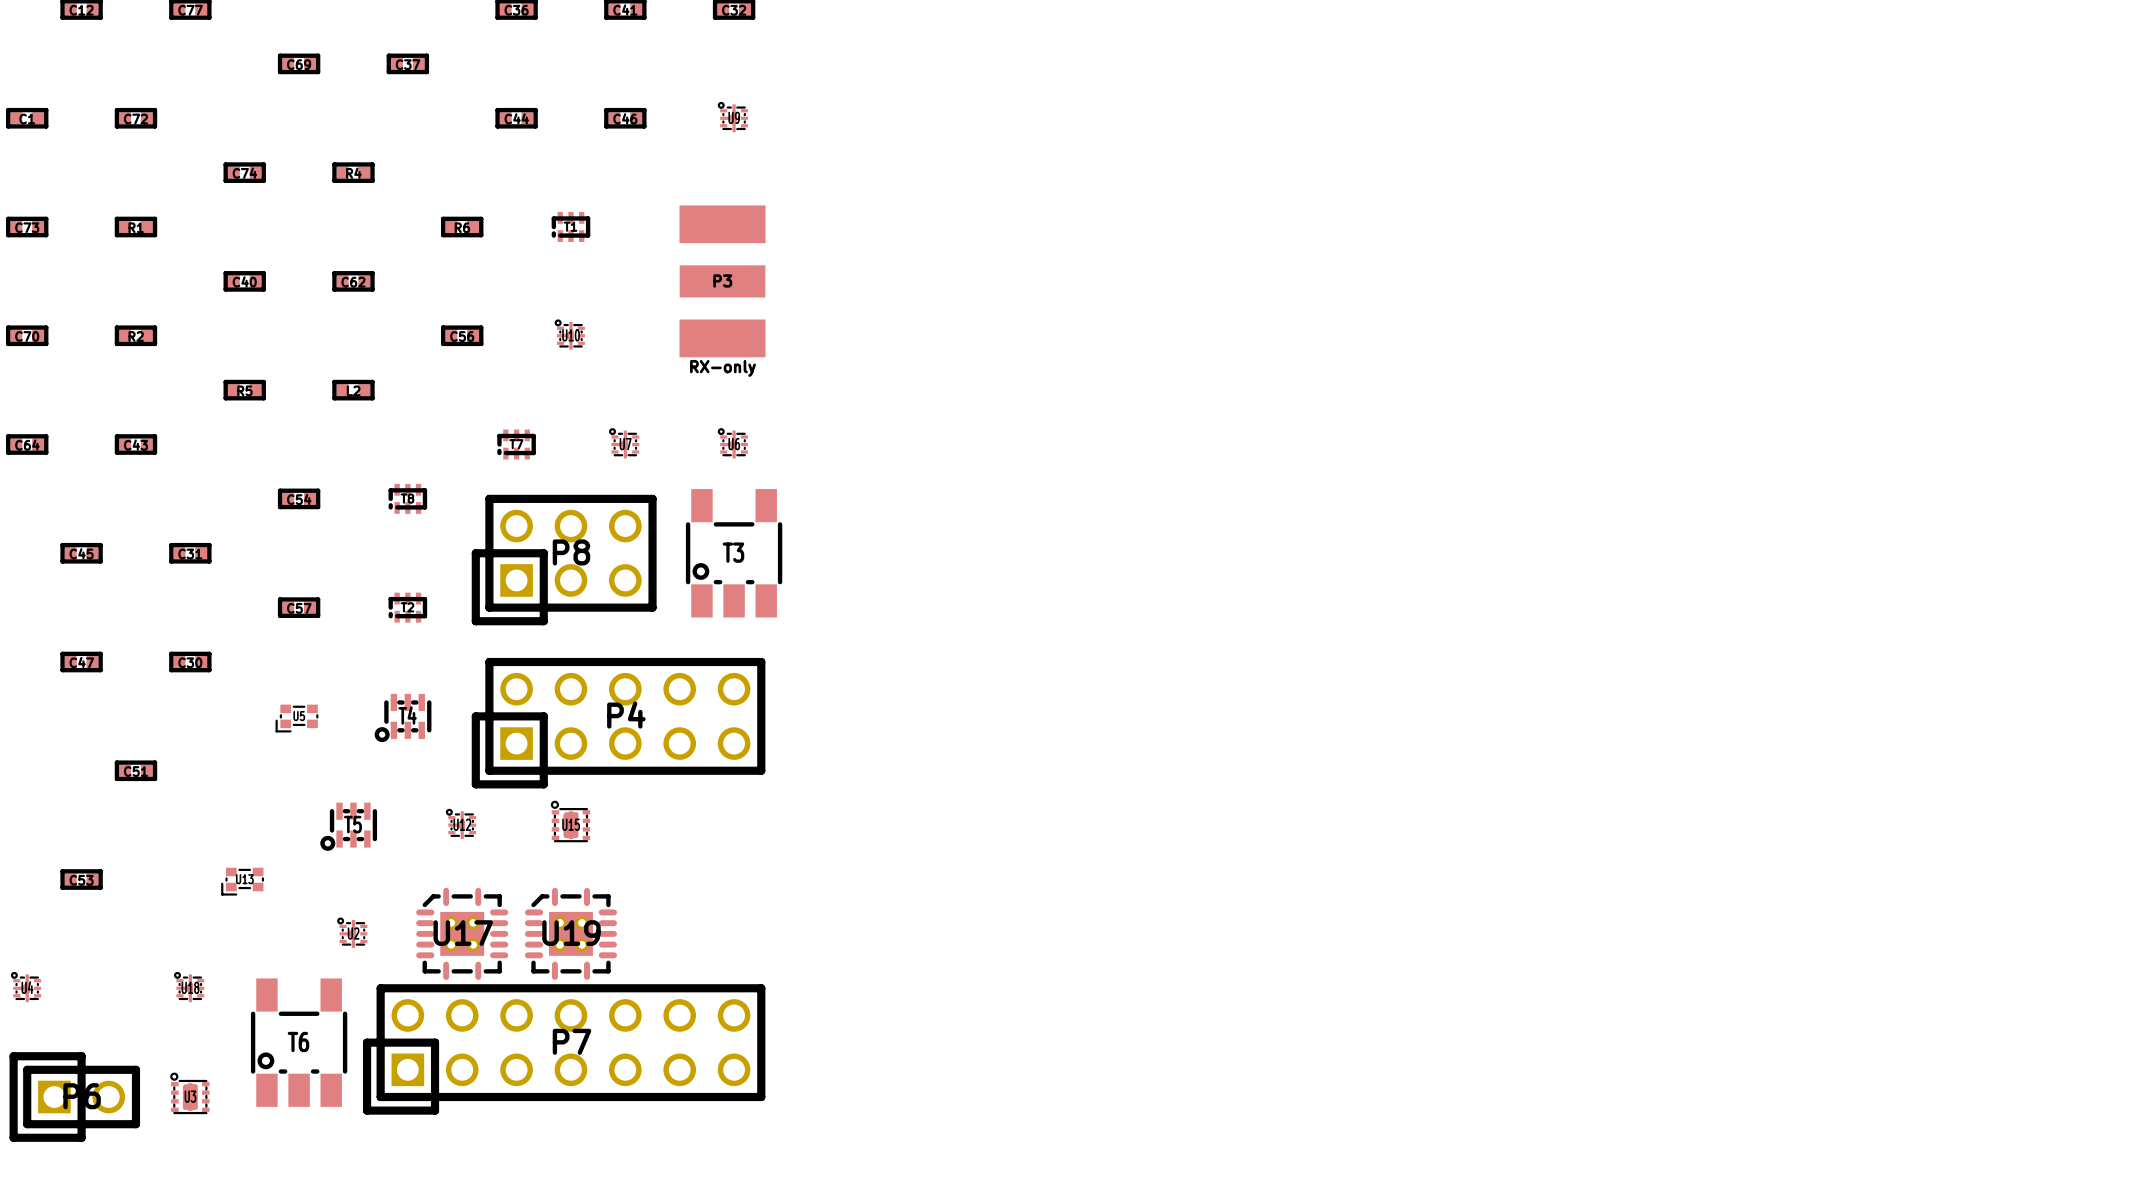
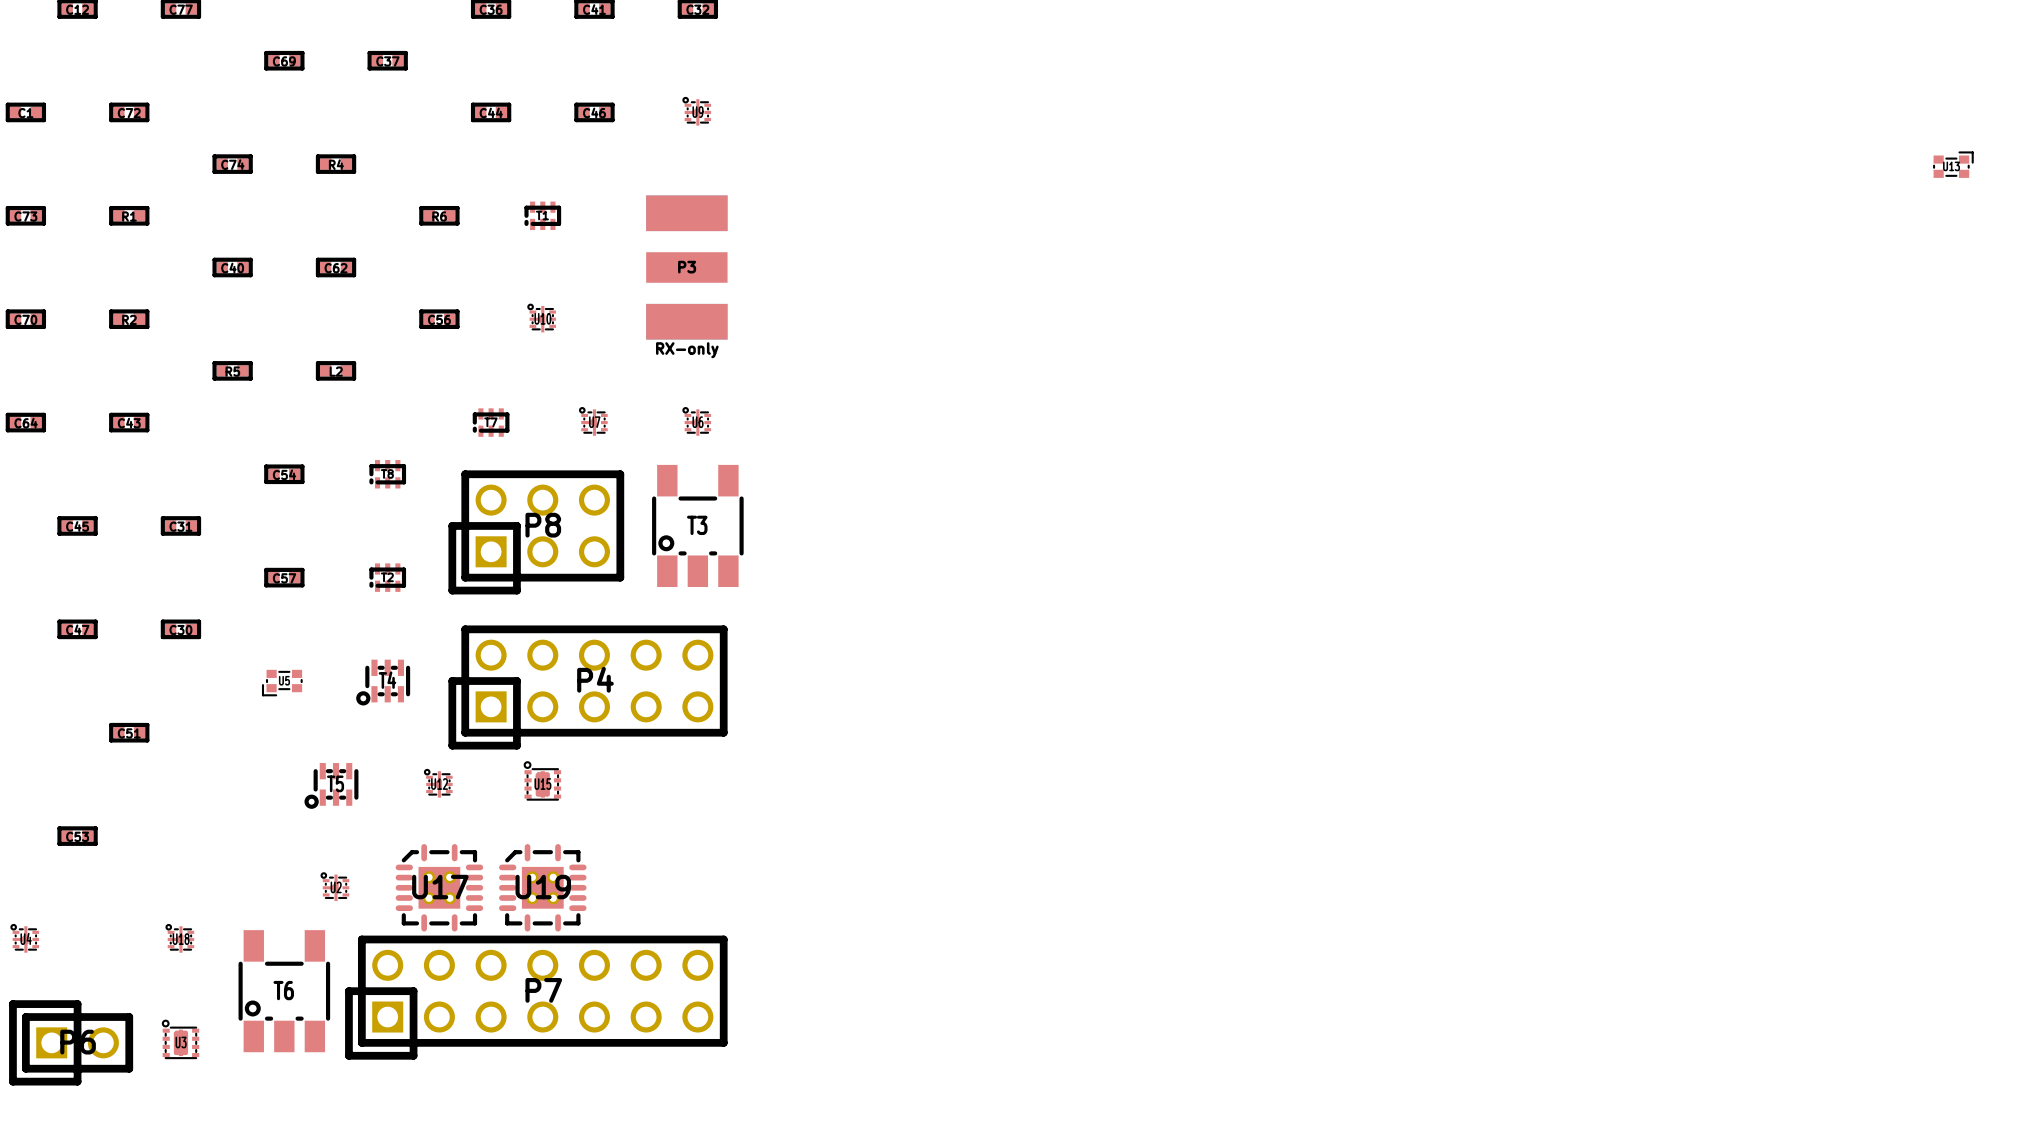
U13 rotation: 0° (242, 881) -> 180° (1953, 164)
U13 position: (242, 881) -> (1953, 164)

